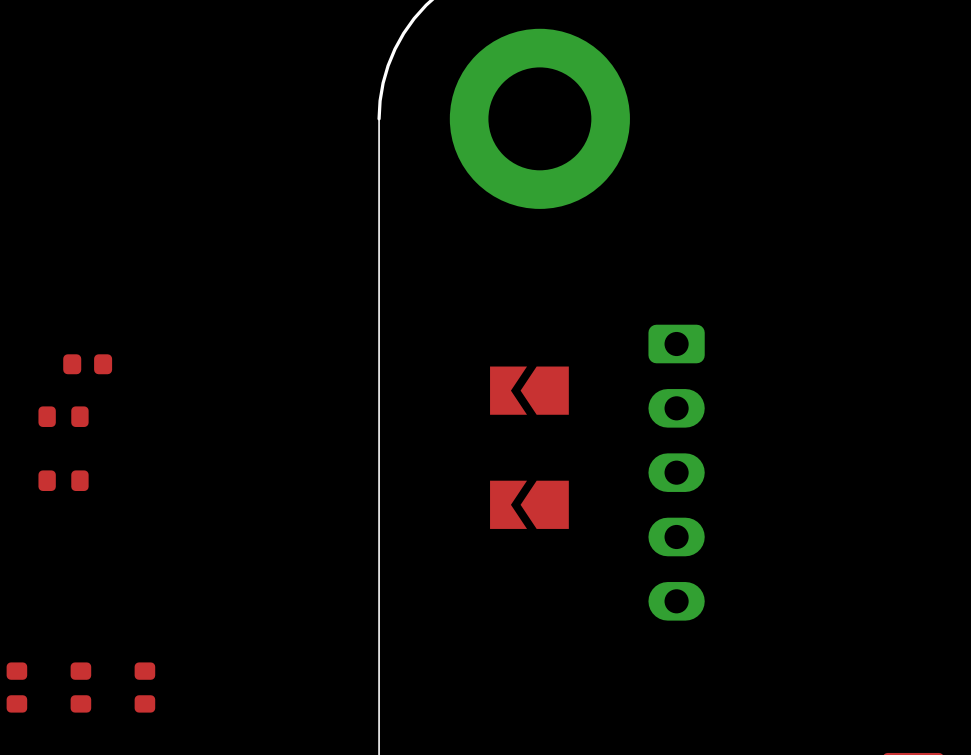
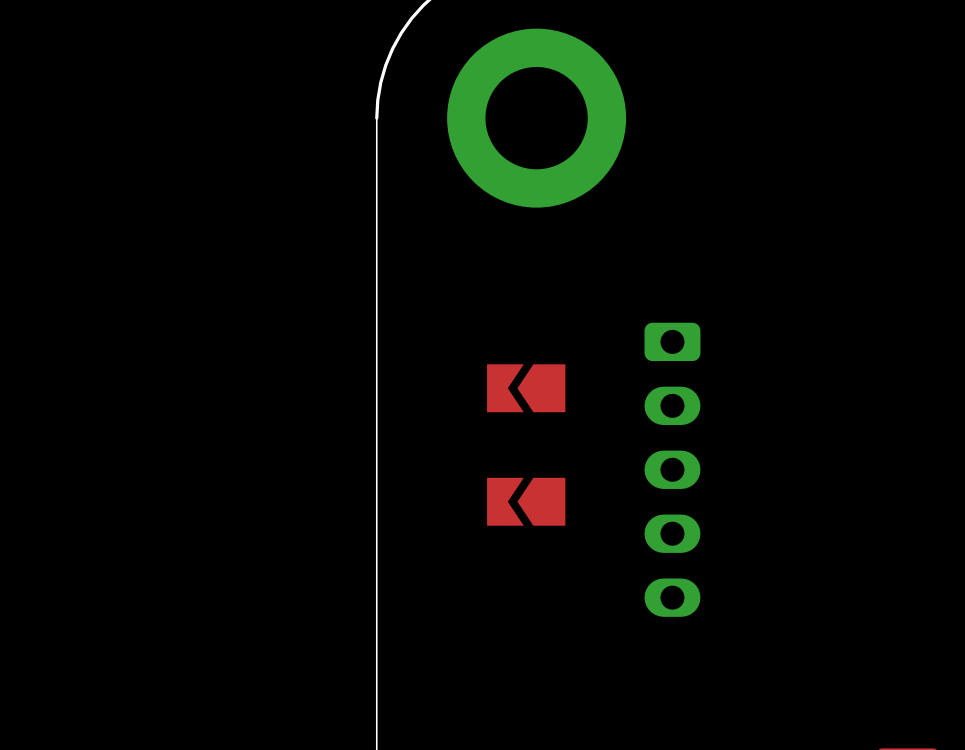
part: (87, 364) -> none
part: (63, 416) -> none
part: (63, 480) -> none
part: (16, 687) -> none
part: (80, 687) -> none
part: (144, 687) -> none

